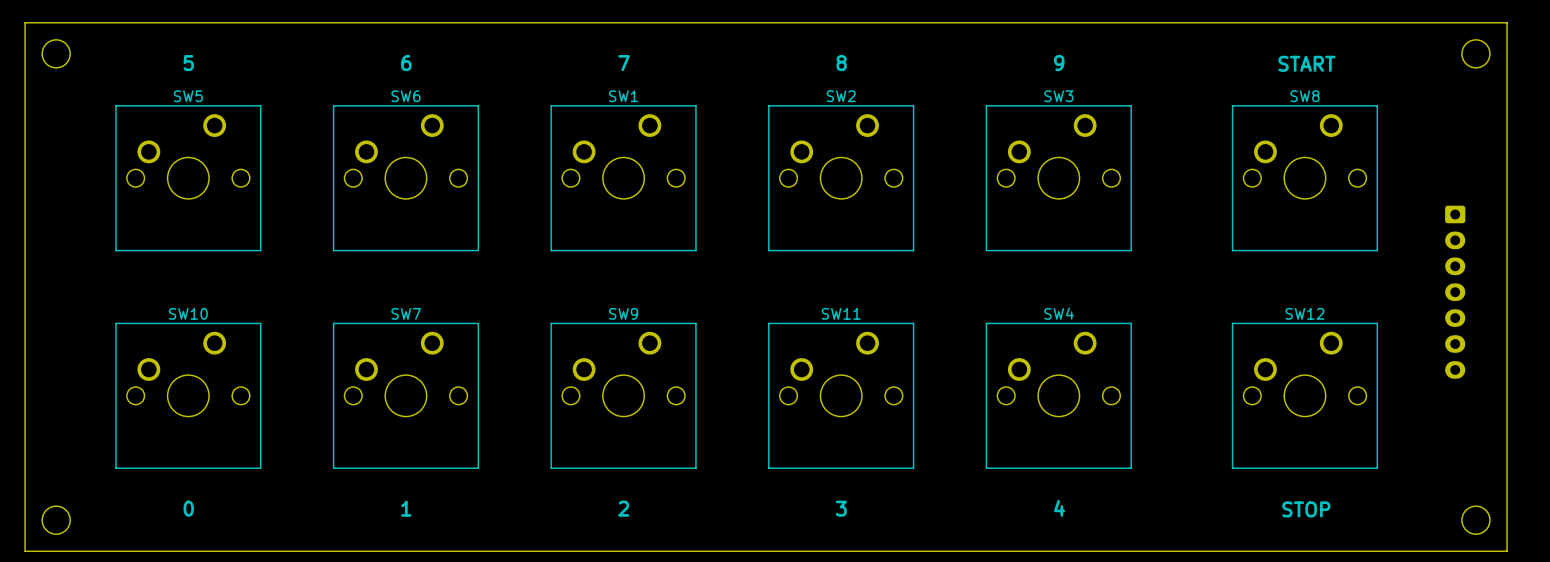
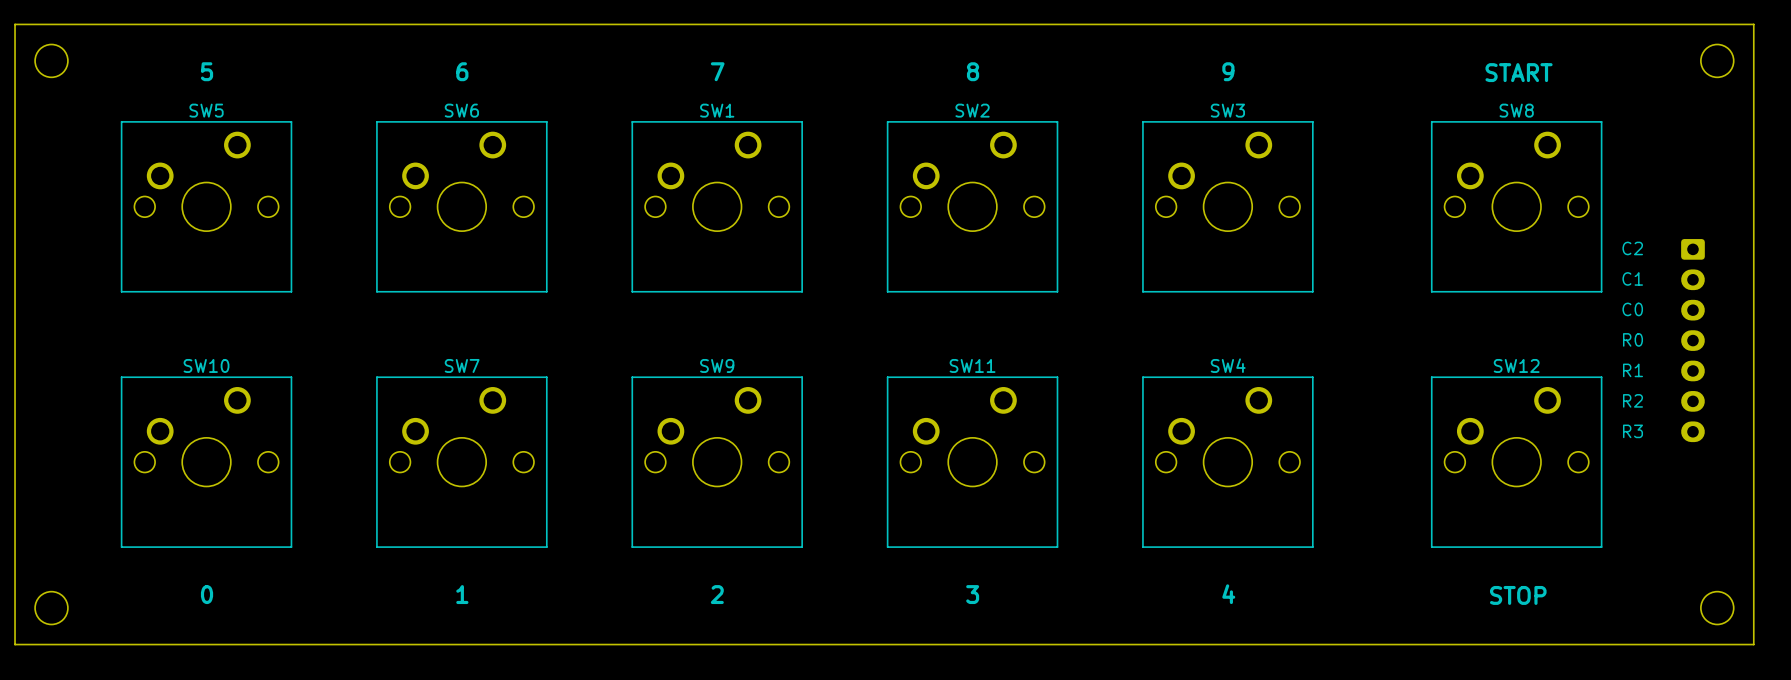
text: none -> C2 (1632, 248)
text: none -> C1 (1632, 278)
text: none -> C0 (1632, 309)
text: none -> R0 (1633, 339)
text: none -> R1 (1633, 370)
text: none -> R2 (1633, 400)
text: none -> R3 (1633, 431)

